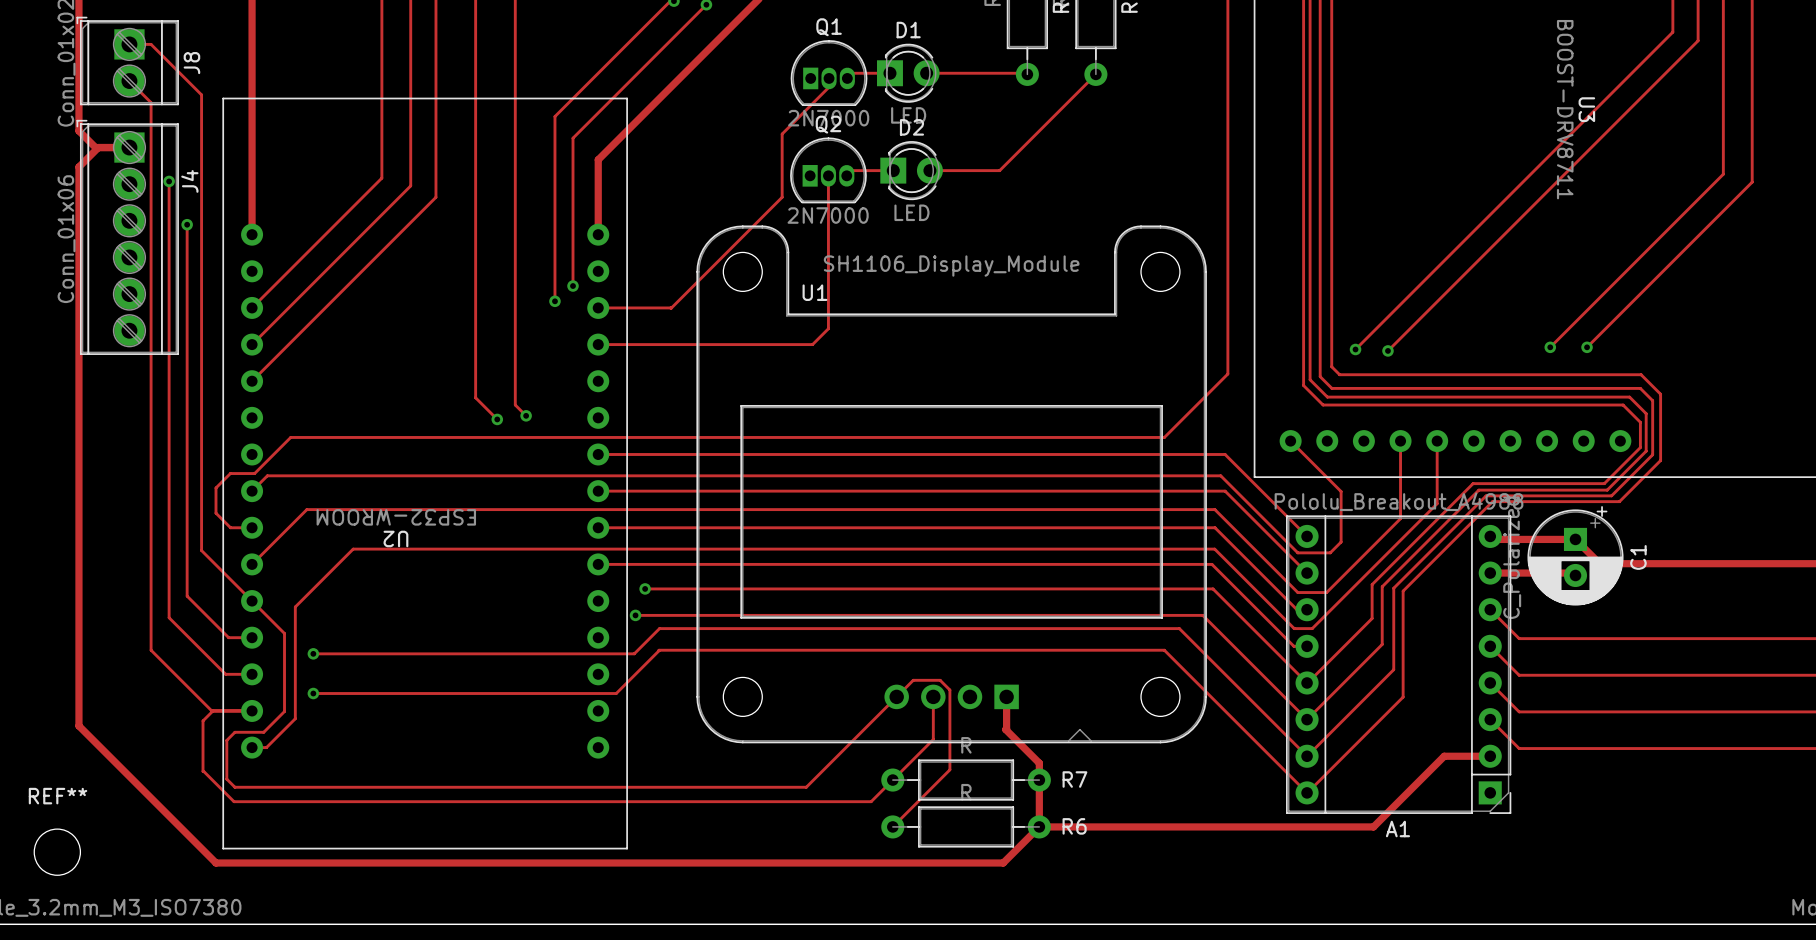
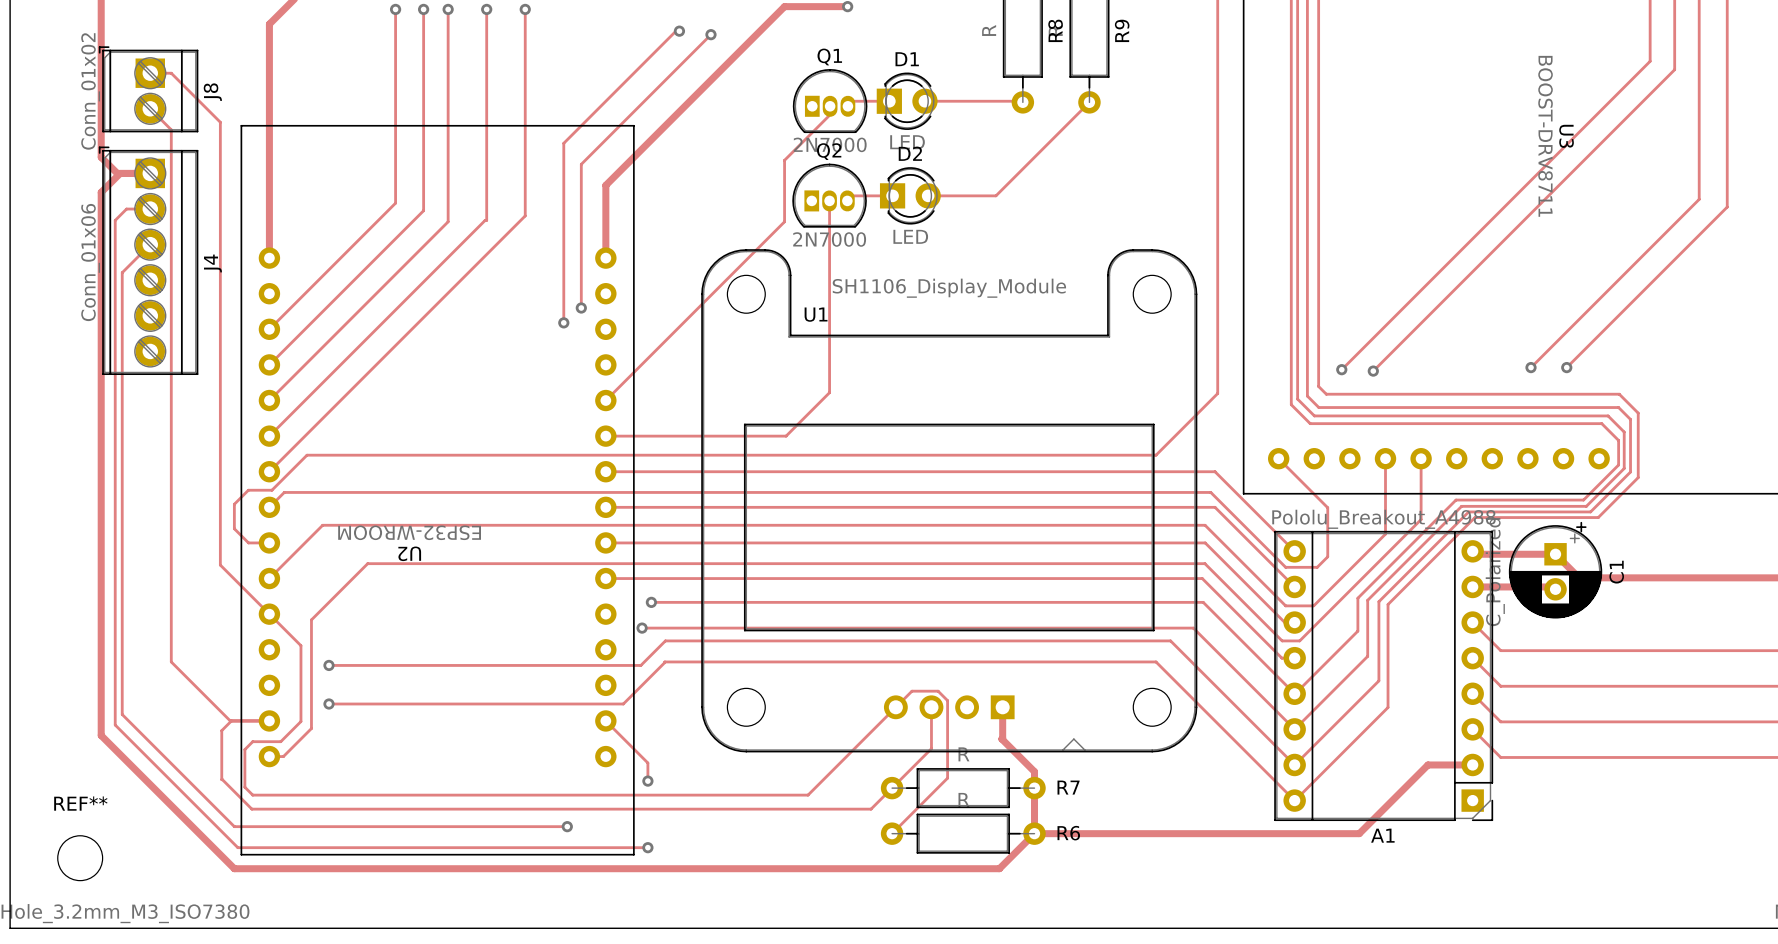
track: (169, 181) (169, 617) (225, 674) (252, 674) -> none
via: (169, 181) -> none
J4 name position: J4 (189, 181) -> J4 (212, 263)
track: none -> (150, 209) (126, 209) (115, 220) (115, 725) (237, 847) (647, 847)
track: (515, 191) (515, 405) (526, 415) -> (525, 215) (269, 471)
track: (475, 195) (475, 397) (497, 419) -> (486, 220) (269, 436)
track: none -> (150, 244) (122, 272) (122, 714) (234, 826) (567, 826)
track: (187, 224) (187, 596) (228, 637) (252, 637) -> none
via: (187, 224) -> none
track: (598, 307) (671, 308) -> (605, 400) (676, 329)
track: (828, 328) (812, 344) (598, 344) -> (829, 349) (829, 392) (786, 436) (605, 436)
via: (526, 415) -> none
via: (497, 419) -> none
track: none -> (605, 720) (647, 763) (647, 781)
via: none -> (647, 781)
via: none -> (567, 826)
via: none -> (647, 847)

